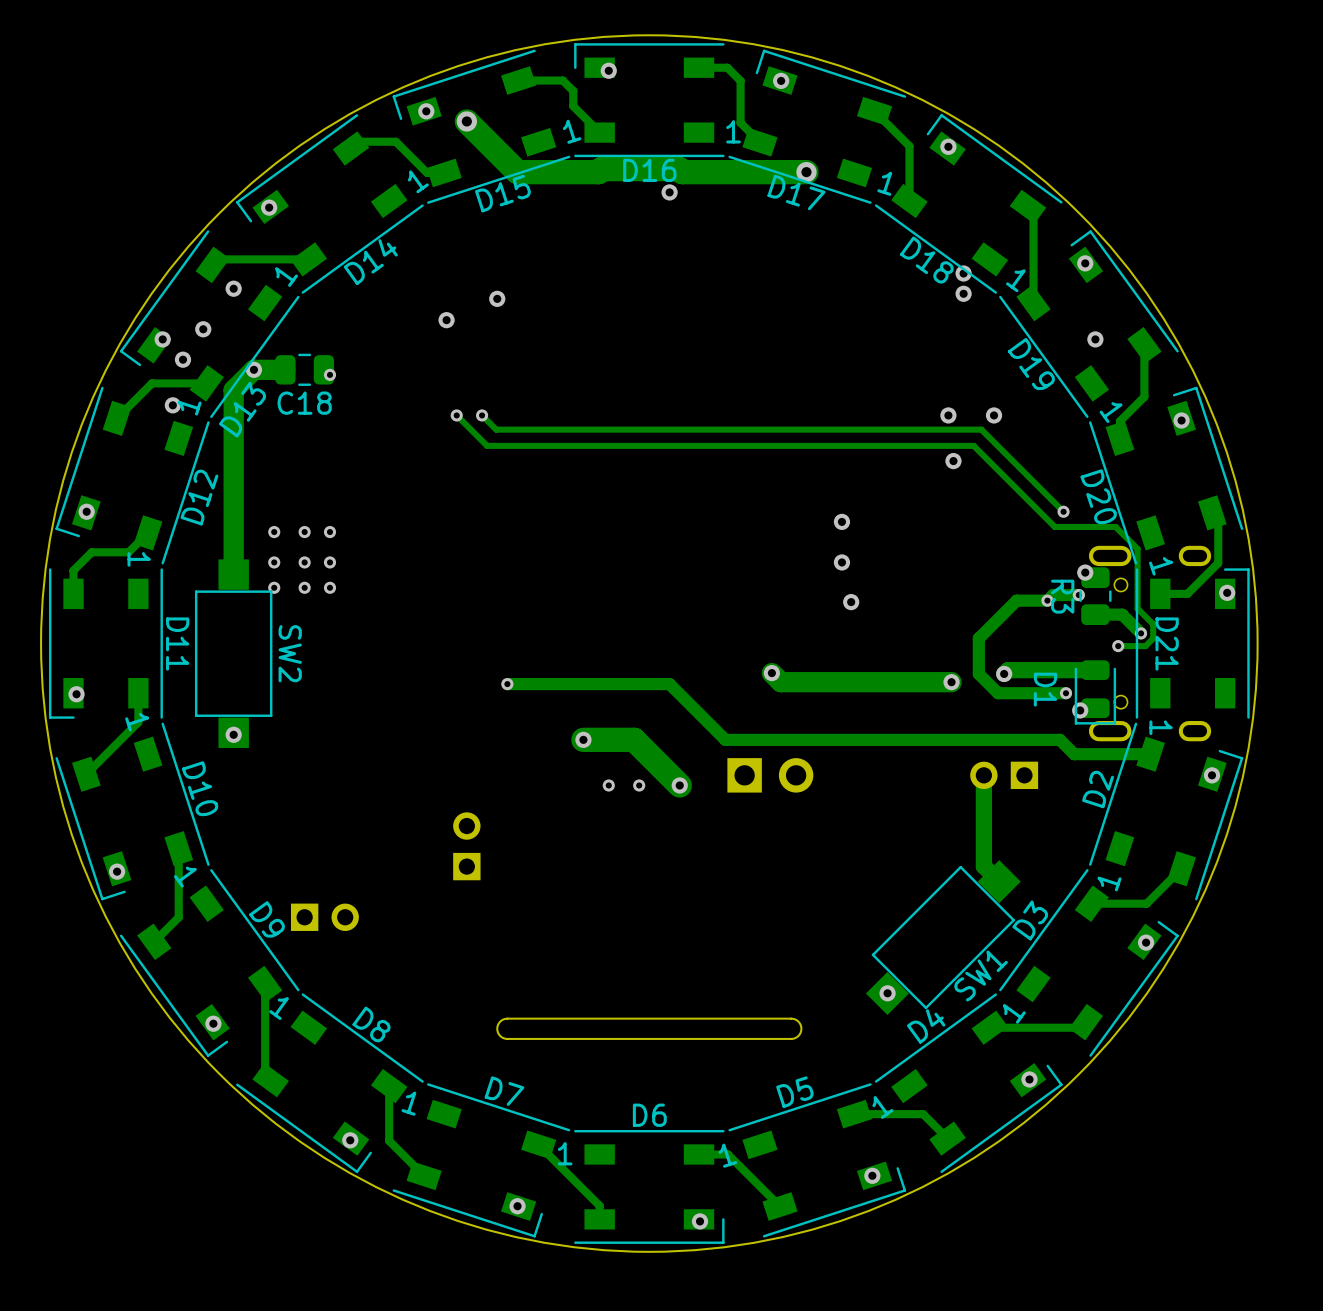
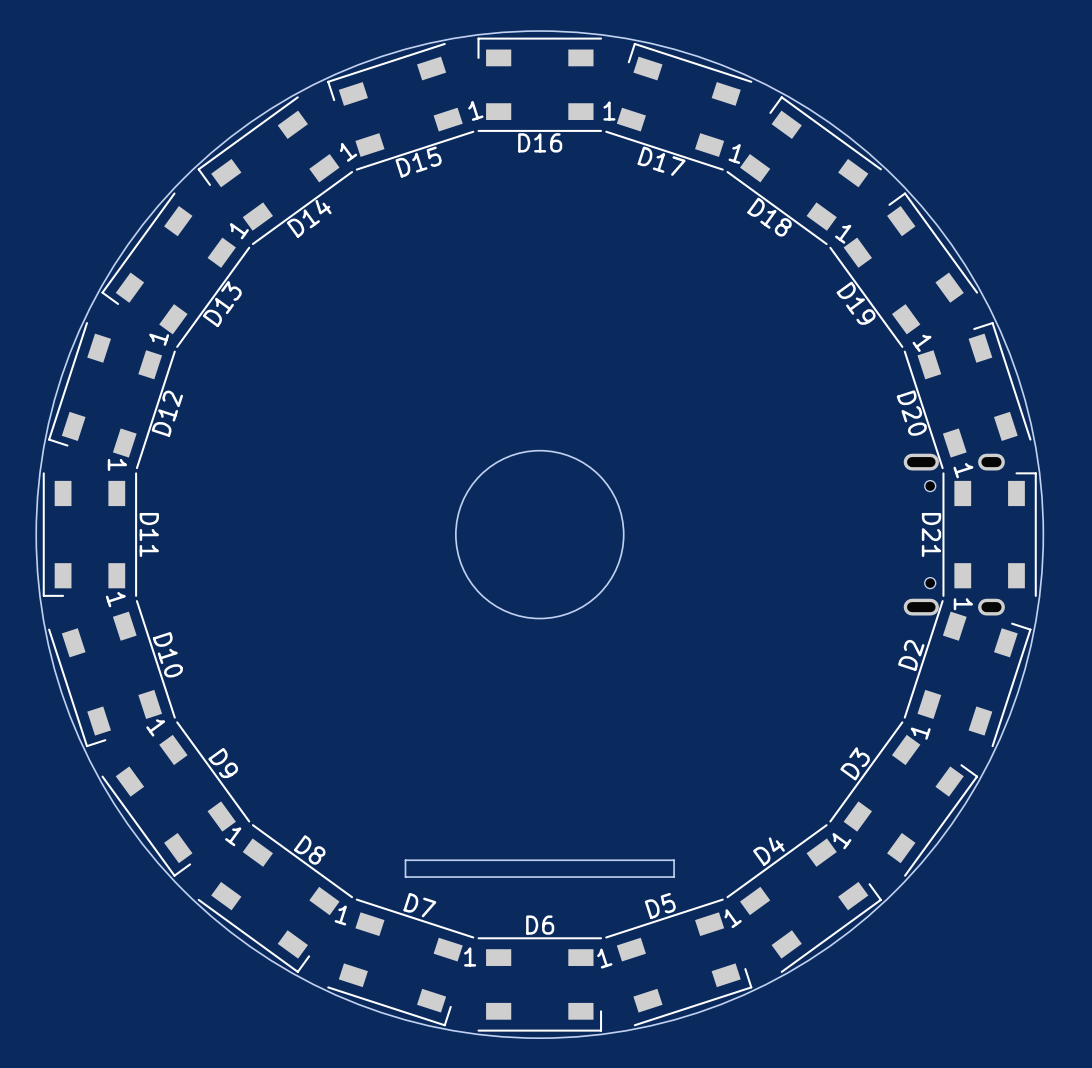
track: (699, 67) (727, 67) (740, 80) (740, 122) (759, 142) -> none
via: (608, 70) -> none
track: (518, 80) (562, 80) (573, 91) (573, 106) (599, 132) -> none
via: (781, 80) -> none
via: (426, 111) -> none
track: (874, 111) (909, 146) (909, 200) -> none
track: (466, 121) (517, 172) (598, 172) (601, 169) (679, 169) (682, 172) (806, 172) -> none
via: (466, 121) -> none
via: (948, 146) -> none
track: (351, 148) (357, 141) (395, 141) (427, 172) (444, 172) -> none
via: (806, 172) -> none
via: (669, 192) -> none
track: (1027, 206) (1033, 212) (1033, 303) -> none
via: (269, 207) -> none
track: (308, 259) (218, 259) (212, 264) -> none
via: (1085, 263) -> none
via: (963, 273) -> none
via: (233, 288) -> none
via: (963, 293) -> none
via: (497, 298) -> none
via: (446, 320) -> none
via: (203, 329) -> none
via: (162, 339) -> none
via: (1095, 339) -> none
track: (1144, 345) (1144, 396) (1119, 421) (1119, 438) -> none
via: (182, 359) -> none
via: (253, 369) -> none
track: (285, 369) (253, 369) (233, 390) (233, 574) -> none
C18: (304, 369) -> none
via: (329, 374) -> none
track: (206, 383) (151, 383) (117, 418) -> none
via: (172, 405) -> none
D13 name position: D13 (242, 409) -> D13 (222, 304)
track: (456, 415) (487, 445) (973, 445) (1054, 526) (1115, 526) (1137, 548) (1137, 608) (1153, 624) (1153, 638) (1145, 646) (1118, 646) -> none
via: (456, 415) -> none
track: (482, 415) (496, 429) (981, 429) (1063, 511) -> none
via: (482, 415) -> none
via: (948, 415) -> none
via: (994, 415) -> none
via: (1181, 420) -> none
via: (953, 461) -> none
via: (86, 511) -> none
via: (1063, 511) -> none
track: (1212, 512) (1218, 518) (1218, 563) (1187, 593) (1160, 593) -> none
via: (841, 521) -> none
track: (148, 532) (128, 552) (91, 552) (73, 570) (73, 593) -> none
via: (274, 532) -> none
via: (304, 532) -> none
via: (329, 532) -> none
round board edge: none -> [455, 449, 625, 620]
via: (274, 562) -> none
via: (304, 562) -> none
via: (329, 562) -> none
via: (841, 562) -> none
via: (1085, 572) -> none
via: (274, 587) -> none
via: (304, 587) -> none
via: (329, 587) -> none
via: (1227, 592) -> none
track: (1078, 595) (1053, 595) (1047, 600) (1016, 600) (978, 638) (978, 673) (998, 693) (1066, 693) -> none
via: (1078, 595) -> none
R3: (1095, 596) -> none
via: (1047, 600) -> none
via: (851, 602) -> none
track: (1095, 614) (1122, 614) (1141, 633) -> none
via: (1141, 633) -> none
D21 name position: D21 (1167, 644) -> D21 (931, 535)
via: (1118, 646) -> none
SW2: (233, 653) -> none
track: (1090, 670) (1007, 670) (1004, 673) -> none
track: (771, 673) (780, 682) (951, 682) -> none
via: (771, 673) -> none
via: (1004, 673) -> none
via: (951, 682) -> none
track: (507, 684) (669, 684) (725, 739) (1059, 739) (1074, 754) (1150, 754) -> none
via: (507, 684) -> none
D1: (1095, 692) -> none
track: (138, 693) (138, 722) (86, 774) -> none
via: (1066, 693) -> none
via: (76, 694) -> none
via: (1080, 710) -> none
via: (233, 734) -> none
track: (583, 739) (634, 739) (679, 785) -> none
via: (583, 739) -> none
part: (770, 775) -> none
track: (983, 775) (983, 866) (999, 881) -> none
part: (1004, 775) -> none
via: (1211, 775) -> none
via: (608, 785) -> none
via: (639, 785) -> none
via: (679, 785) -> none
part: (466, 846) -> none
track: (178, 848) (178, 917) (154, 941) -> none
track: (1181, 868) (1146, 903) (1091, 903) -> none
via: (117, 871) -> none
part: (324, 917) -> none
SW1: (943, 937) -> none
via: (1146, 942) -> none
track: (265, 984) (265, 1074) (270, 1080) -> none
via: (887, 993) -> none
board edge: (791, 1018) (507, 1018) (500, 1021) (497, 1028) (500, 1035) (507, 1038) (791, 1038) (798, 1035) (801, 1028) (798, 1021) (791, 1018) -> none
track: (1085, 1022) (1080, 1027) (989, 1027) -> none
via: (213, 1023) -> none
board edge: none -> (674, 860) (405, 860) (405, 877) (674, 877) (674, 860)
via: (1029, 1079) -> none
track: (389, 1086) (389, 1140) (424, 1175) -> none
track: (854, 1114) (923, 1114) (947, 1138) -> none
via: (350, 1140) -> none
track: (538, 1144) (599, 1205) (599, 1219) -> none
track: (699, 1154) (727, 1154) (780, 1206) -> none
via: (872, 1175) -> none
via: (517, 1206) -> none
via: (700, 1221) -> none

